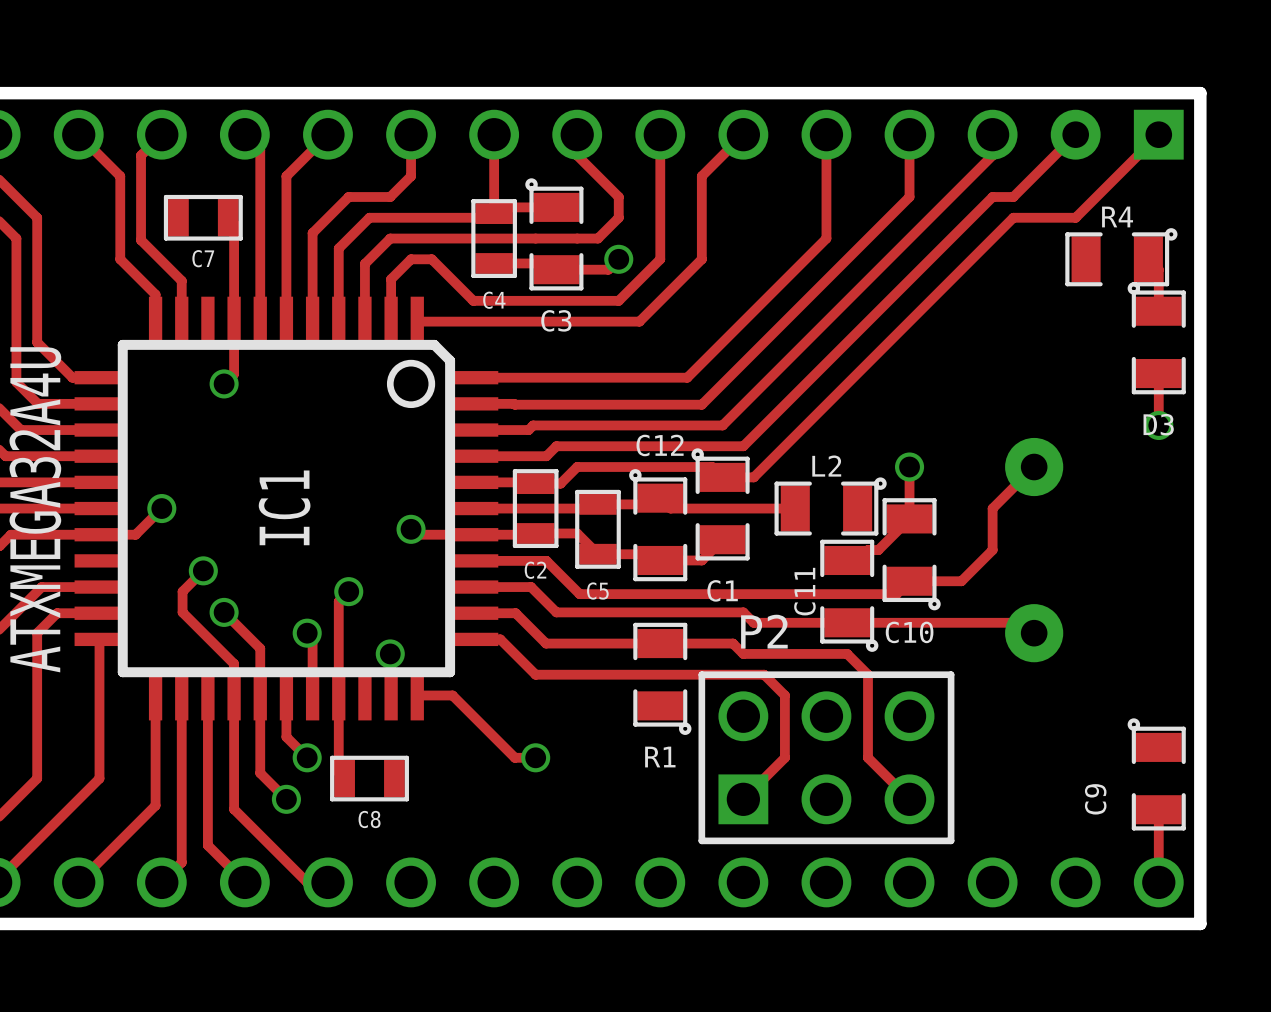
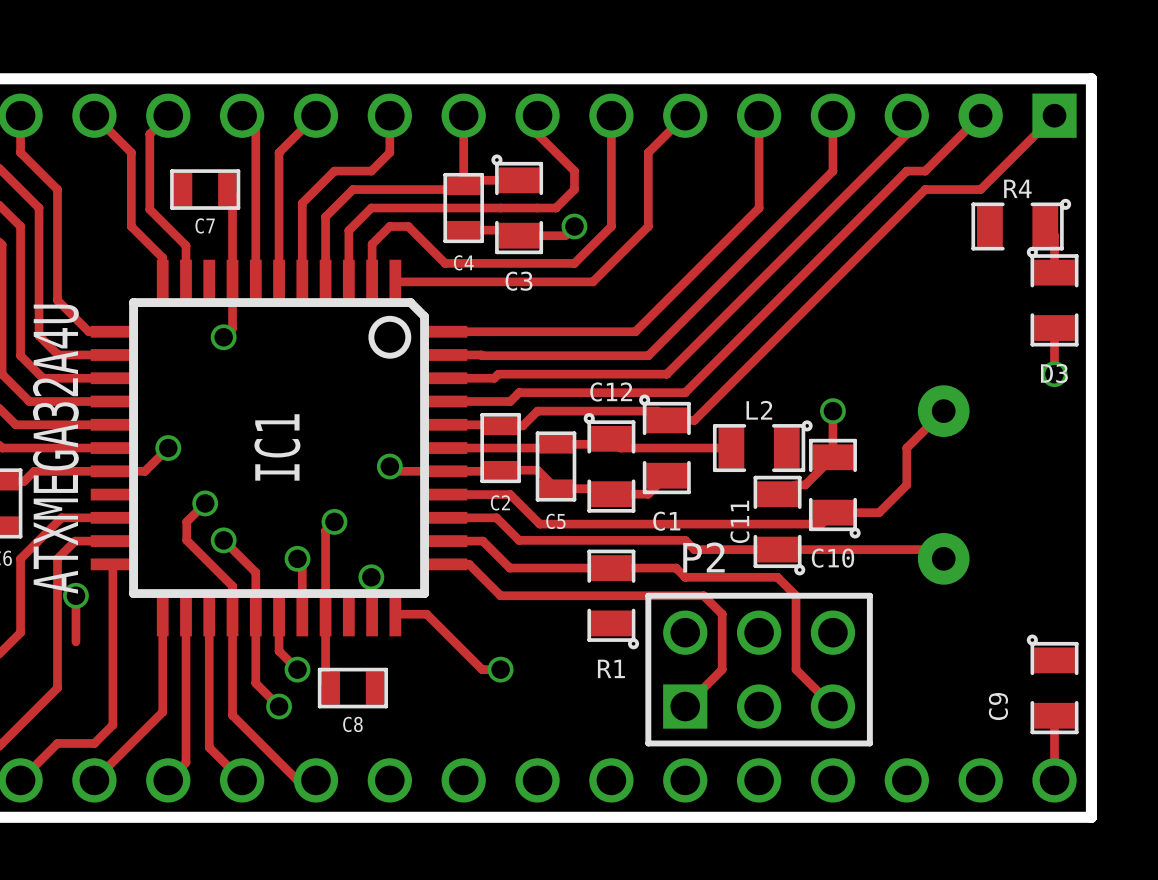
track: none -> (75, 595) (75, 641)
via: none -> (75, 595)
track: (99, 778) (37, 840) -> (112, 688) (112, 725) (94, 743) (57, 743)

